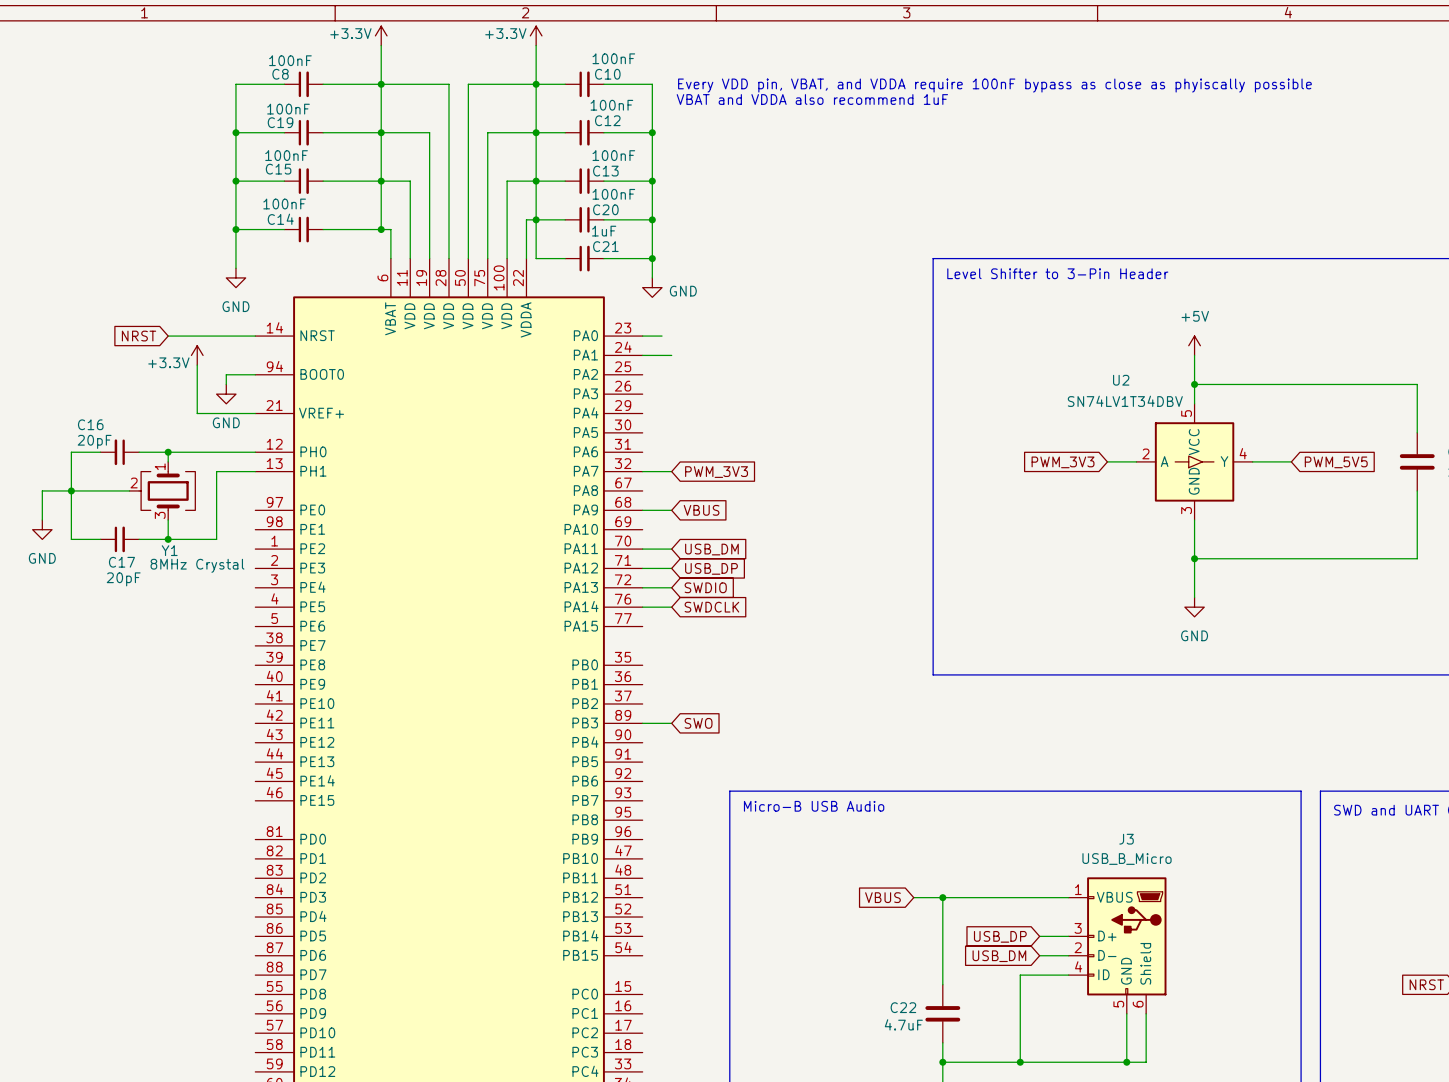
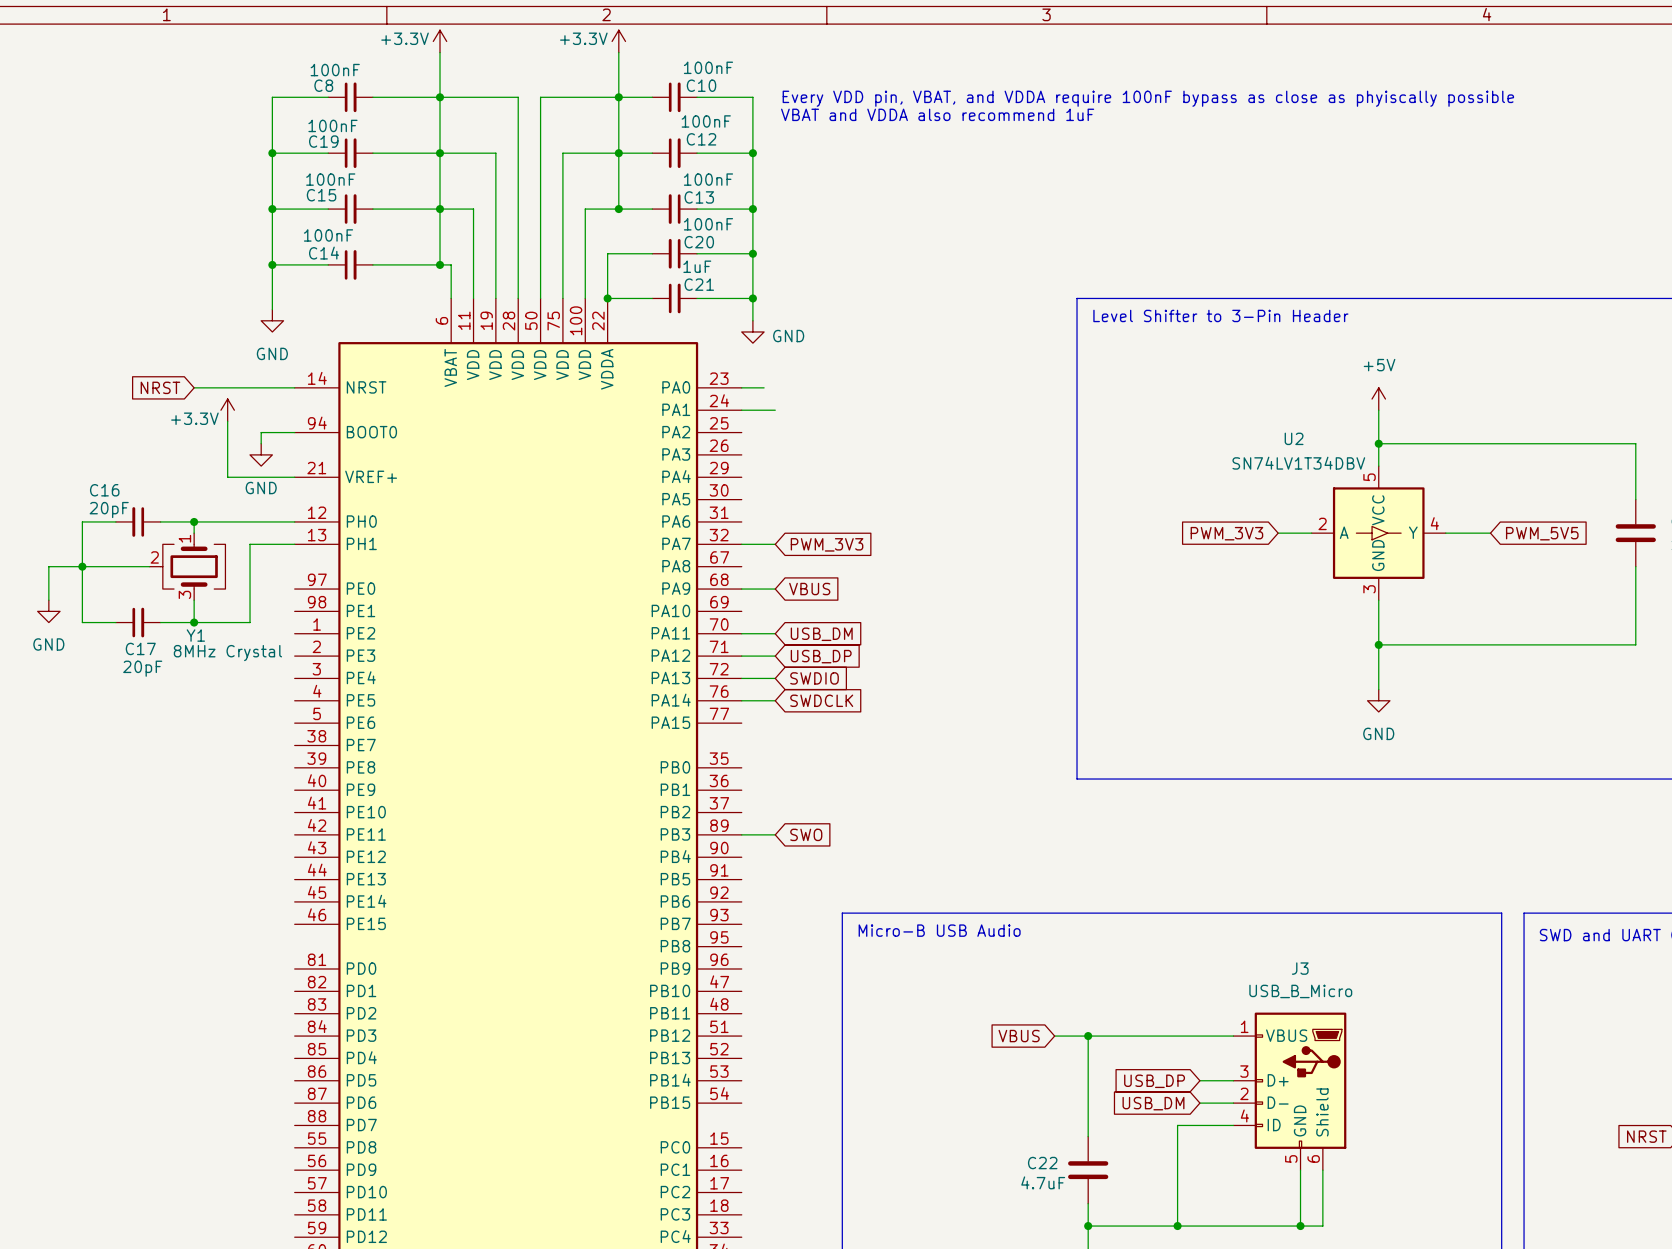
wire: (536, 181) (536, 258) -> (607, 298) (618, 298)
junction position: (536, 219) -> (607, 298)

